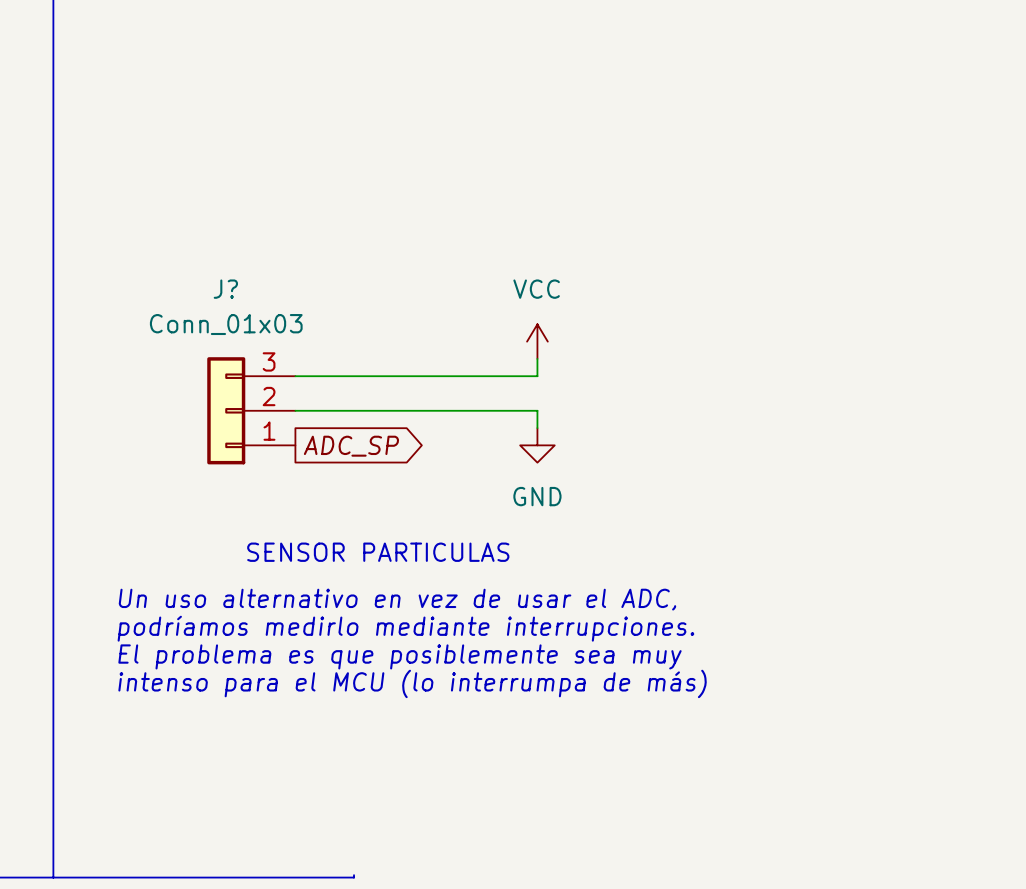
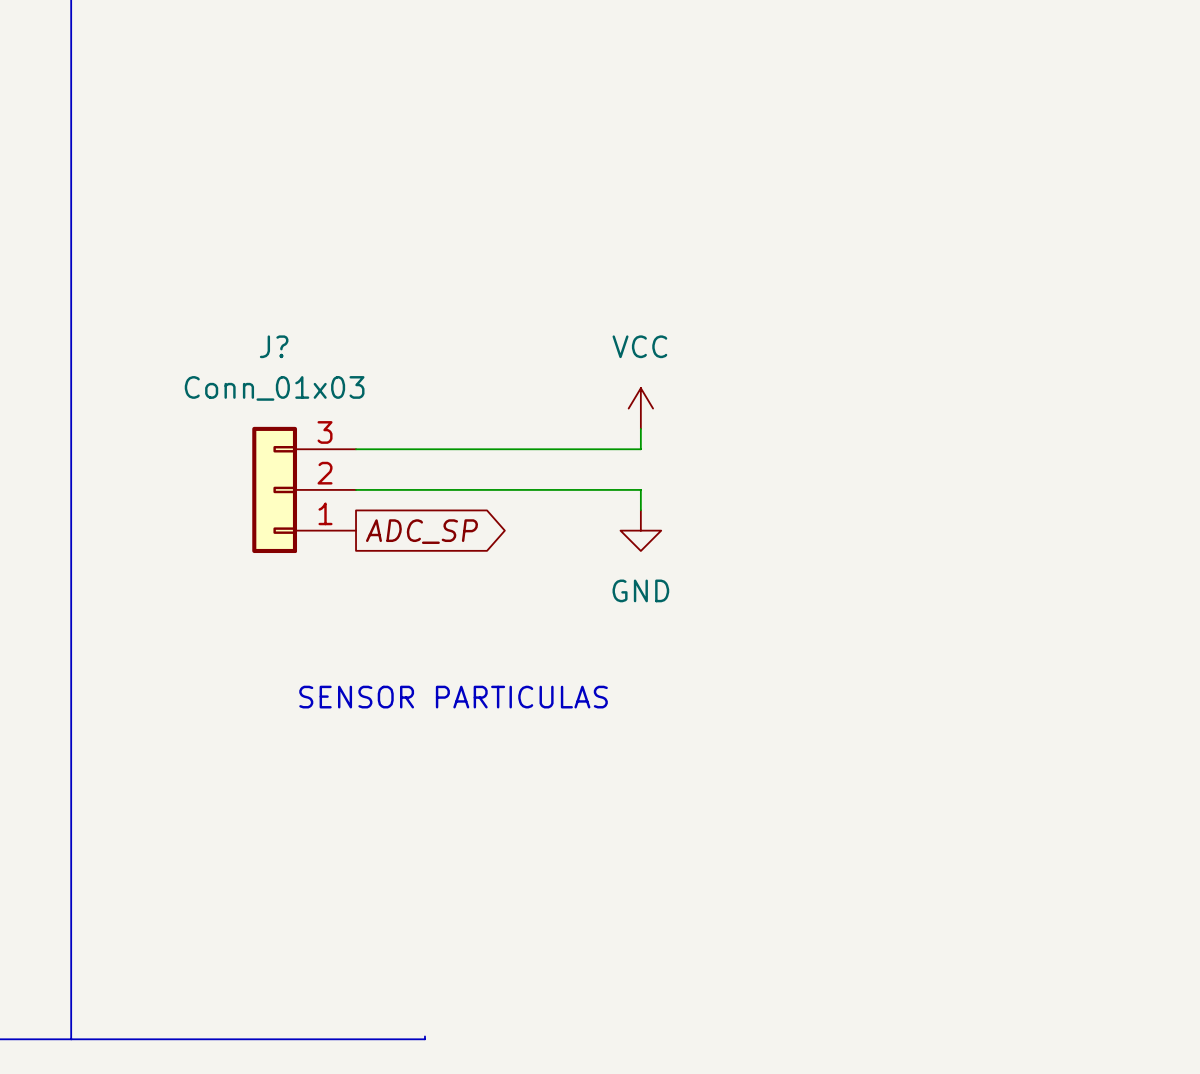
text position: SENSOR PARTICULAS (378, 552) -> SENSOR PARTICULAS (453, 697)
text: Un uso alternativo en vez de usar el ADC, (397, 599) -> none
text: podríamos medirlo mediante interrupciones. (405, 628) -> none
text: El problema es que posiblemente sea muy (399, 656) -> none
text: intenso para el MCU (lo interrumpa de más) (412, 683) -> none

